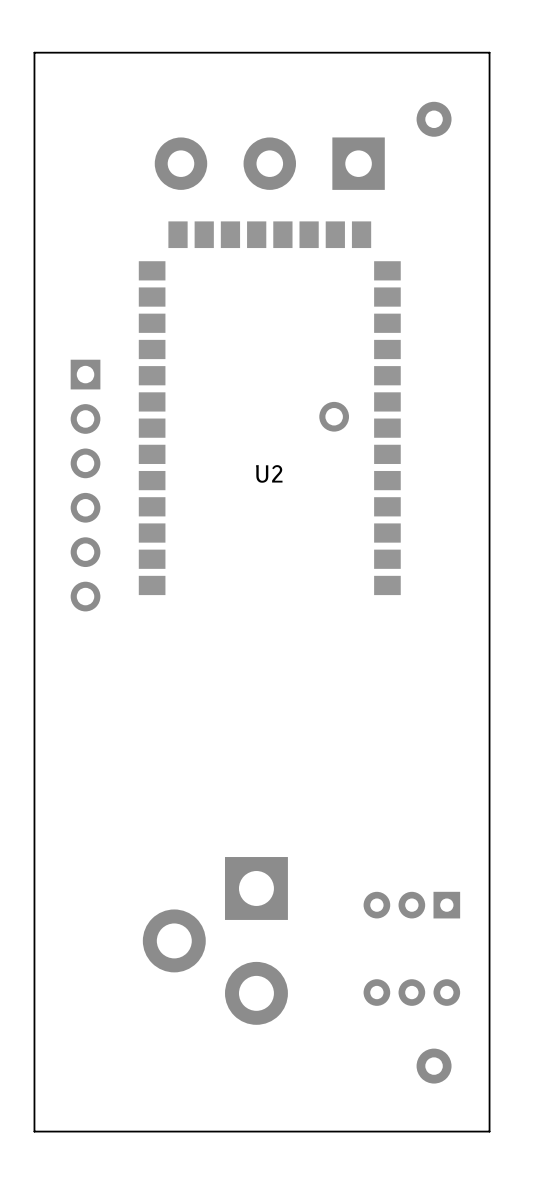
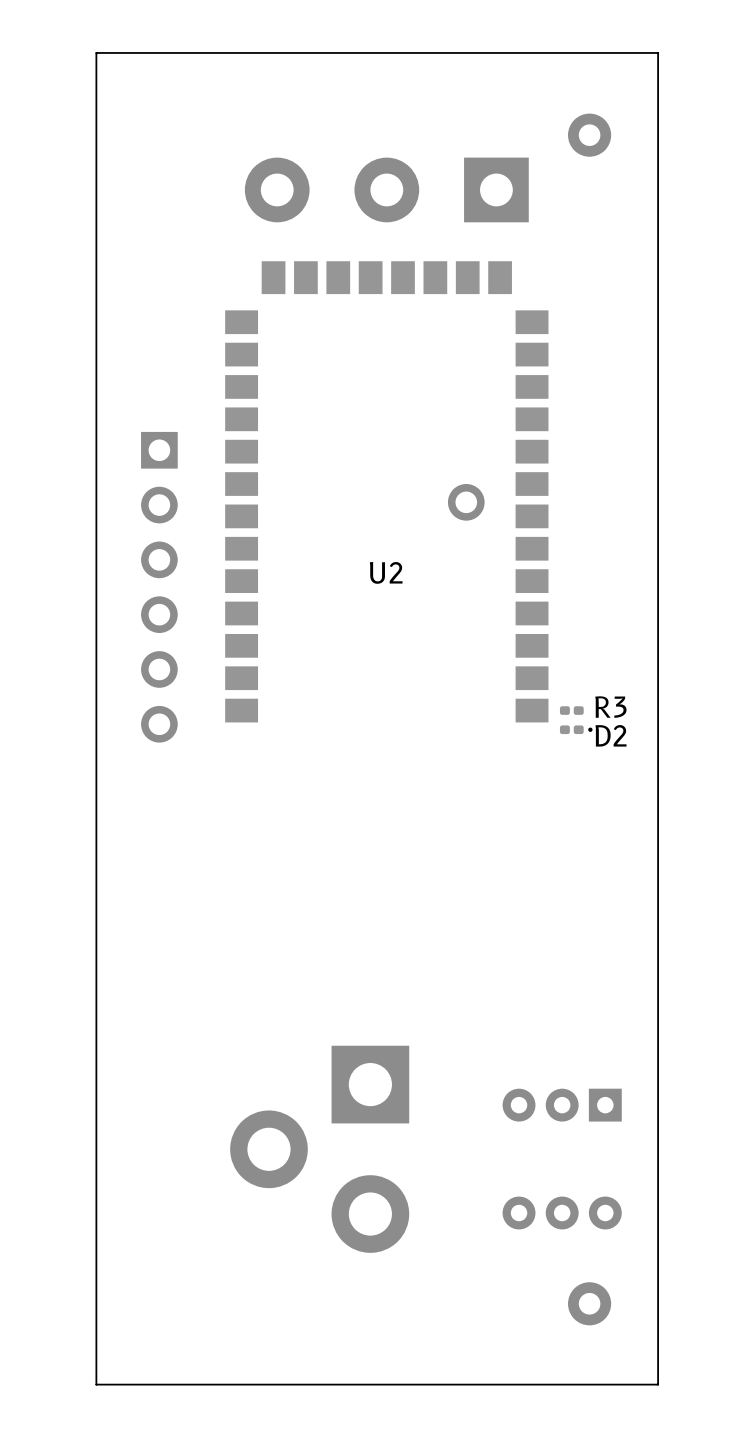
R3: none -> (571, 710)
D2: none -> (576, 729)

